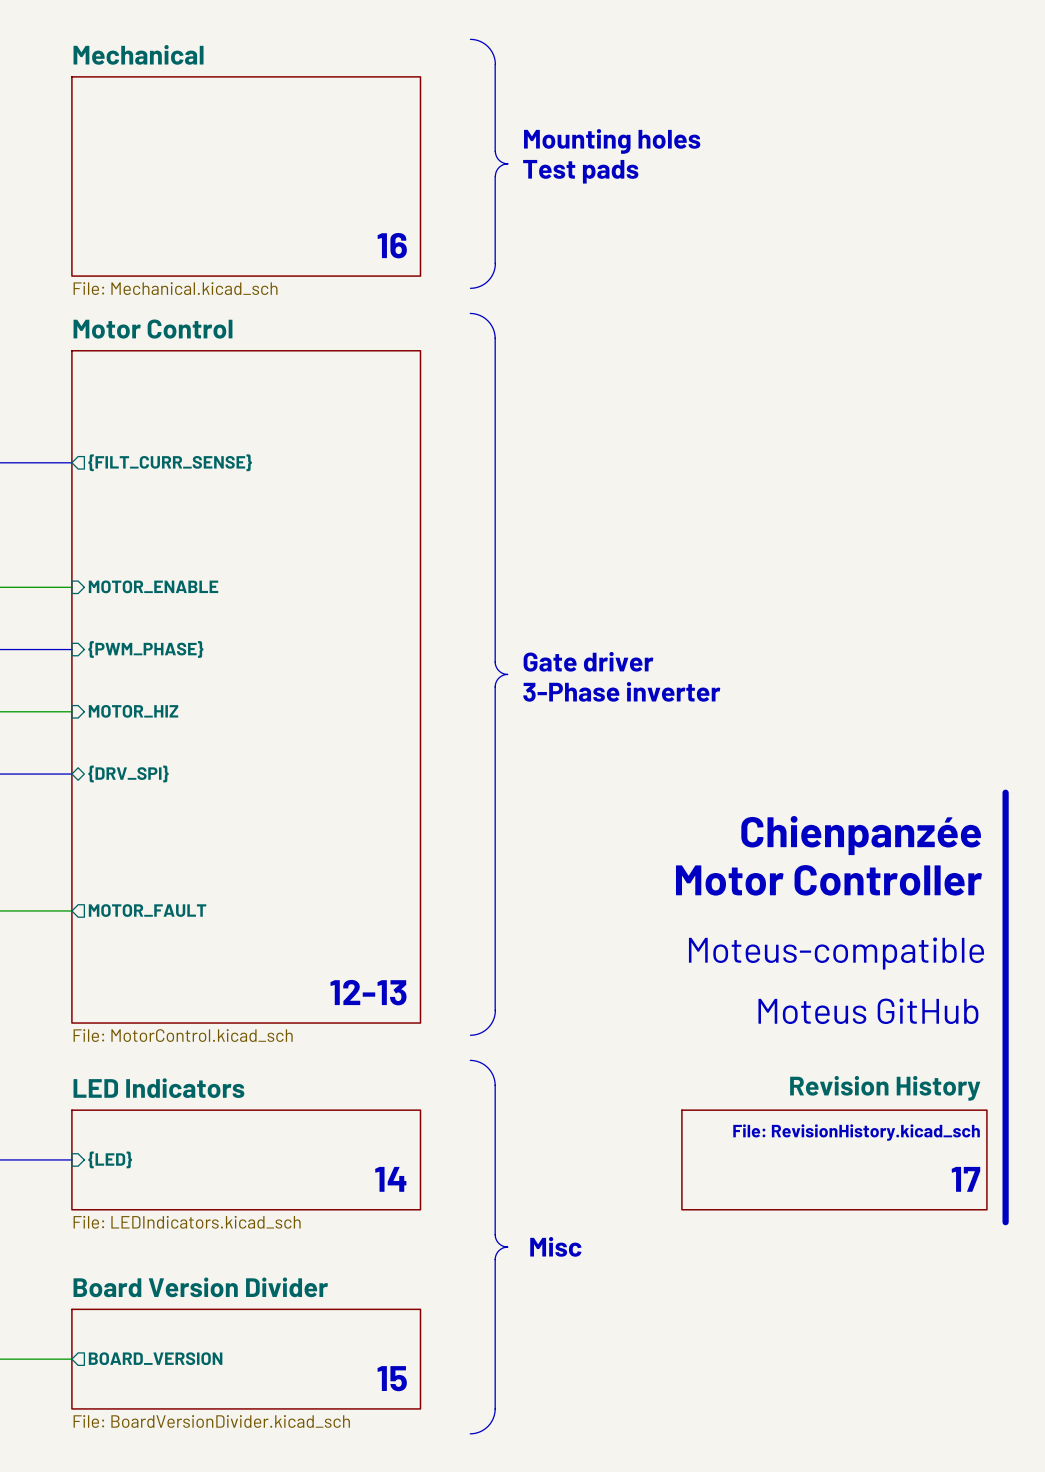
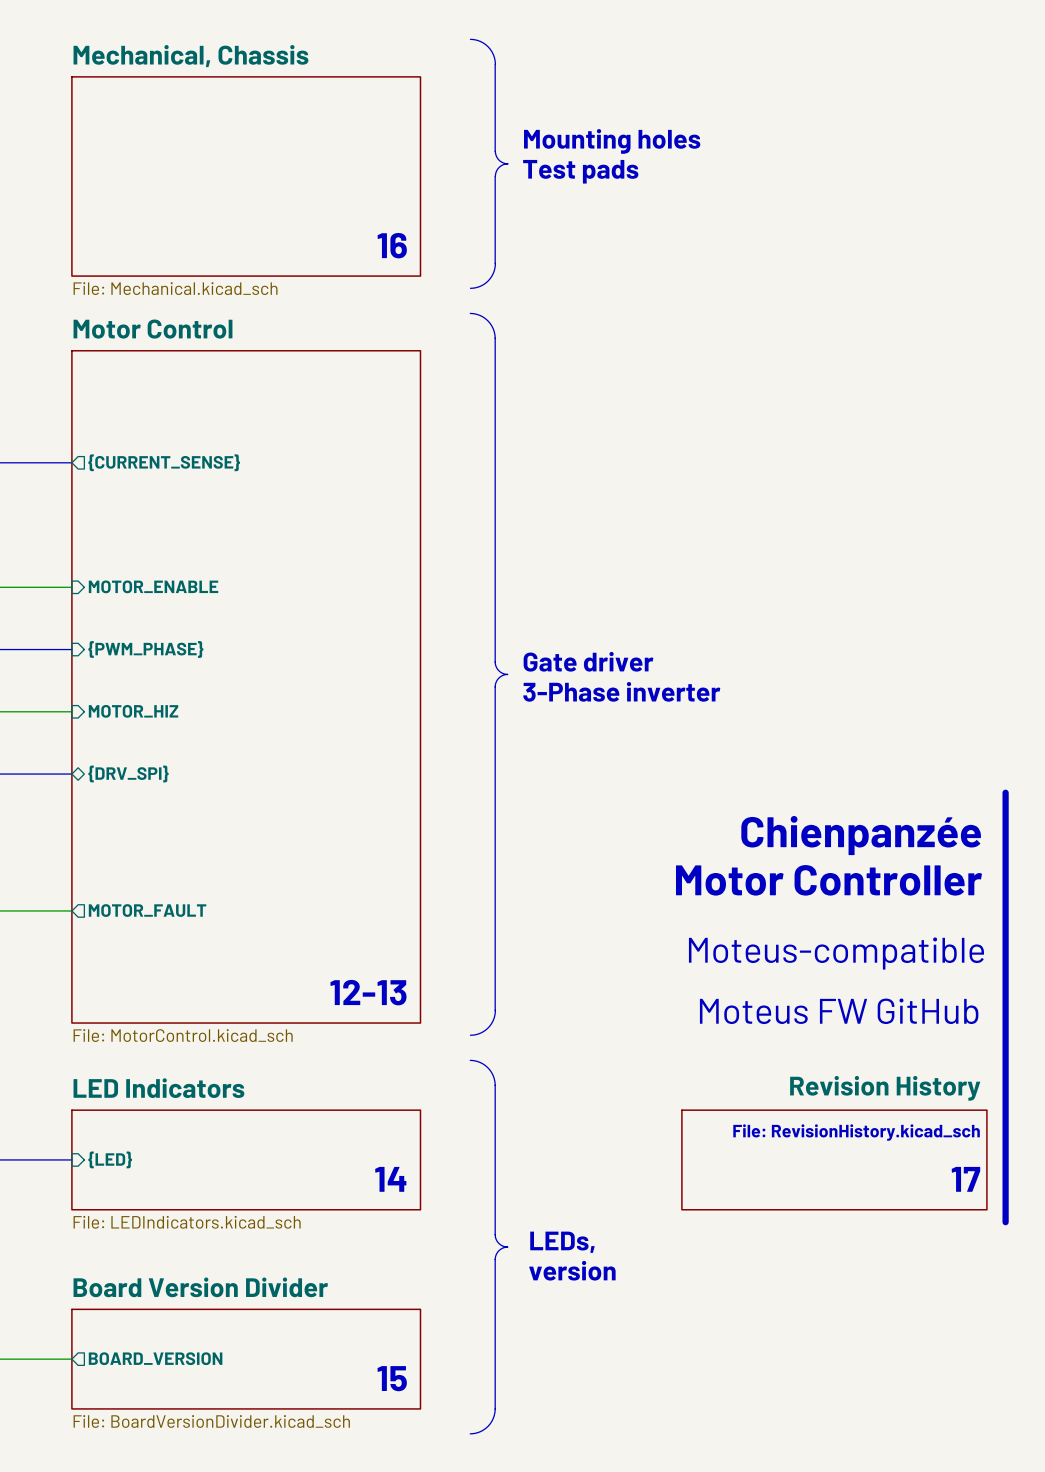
sheet Mechanical name: Mechanical (138, 54) -> Mechanical, Chassis (190, 56)
sheet pin: {FILT_CURR_SENSE} (170, 462) -> {CURRENT_SENSE} (164, 462)
text: Moteus GitHub (868, 1011) -> Moteus FW GitHub (839, 1011)
text: Misc (555, 1246) -> LEDs, (562, 1242)
text: none -> version (572, 1270)

